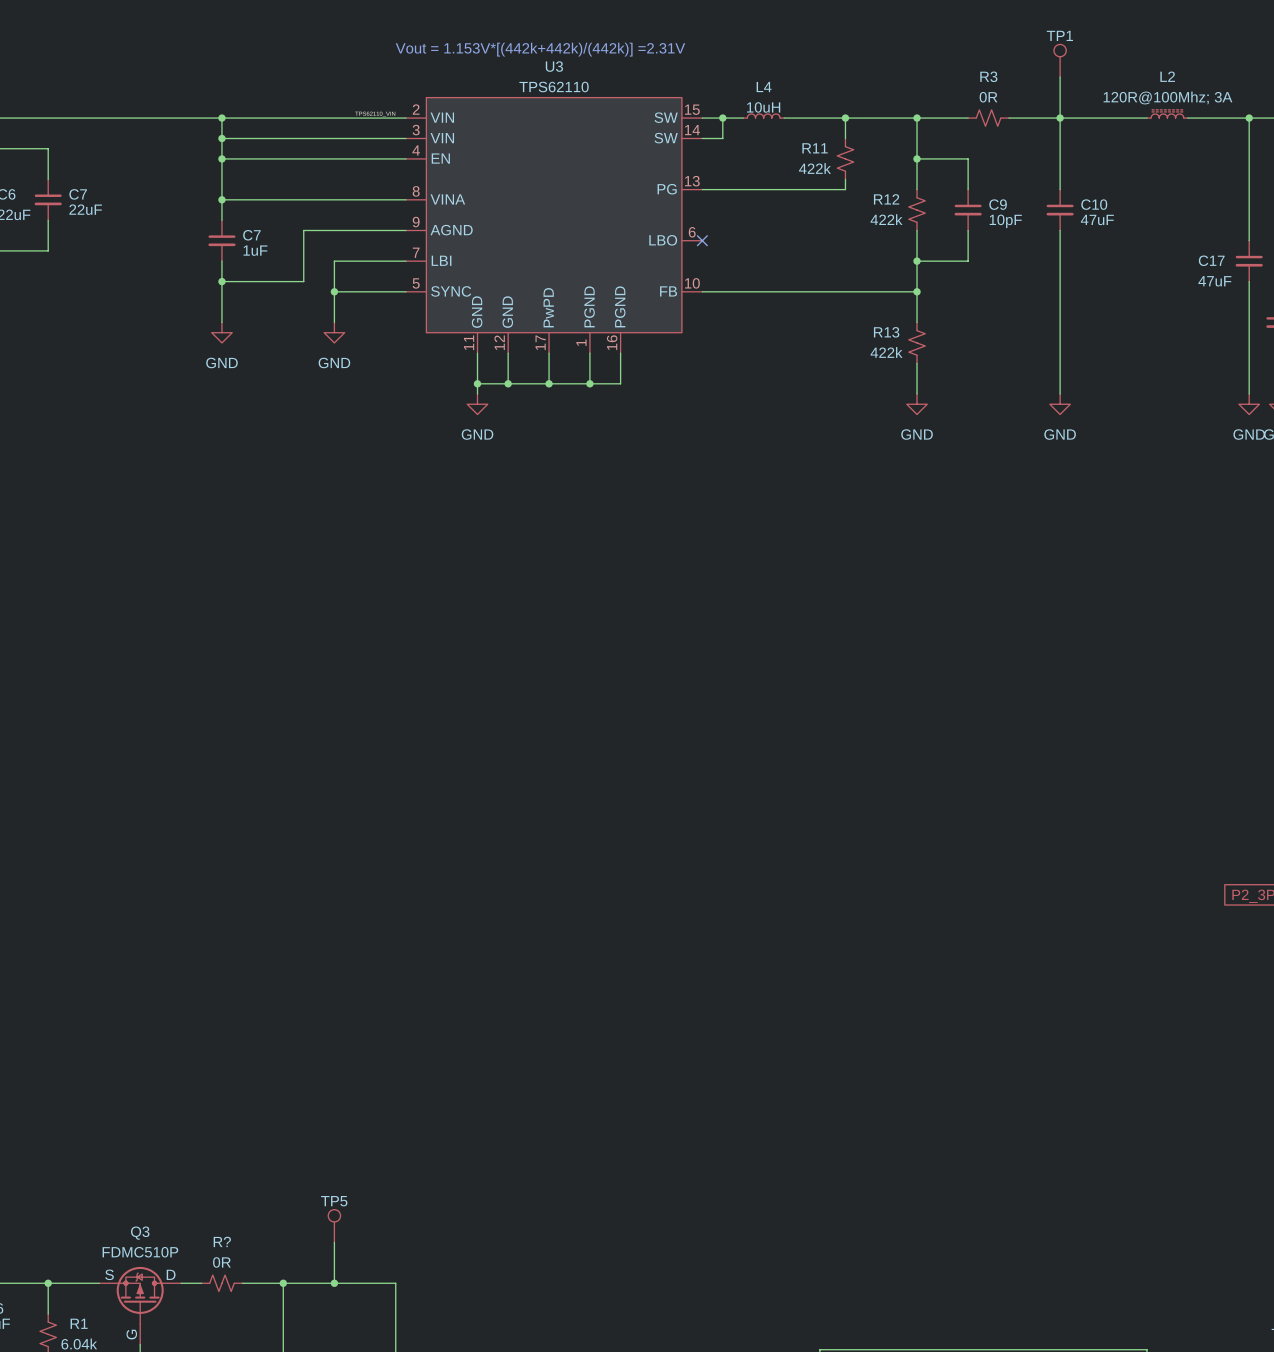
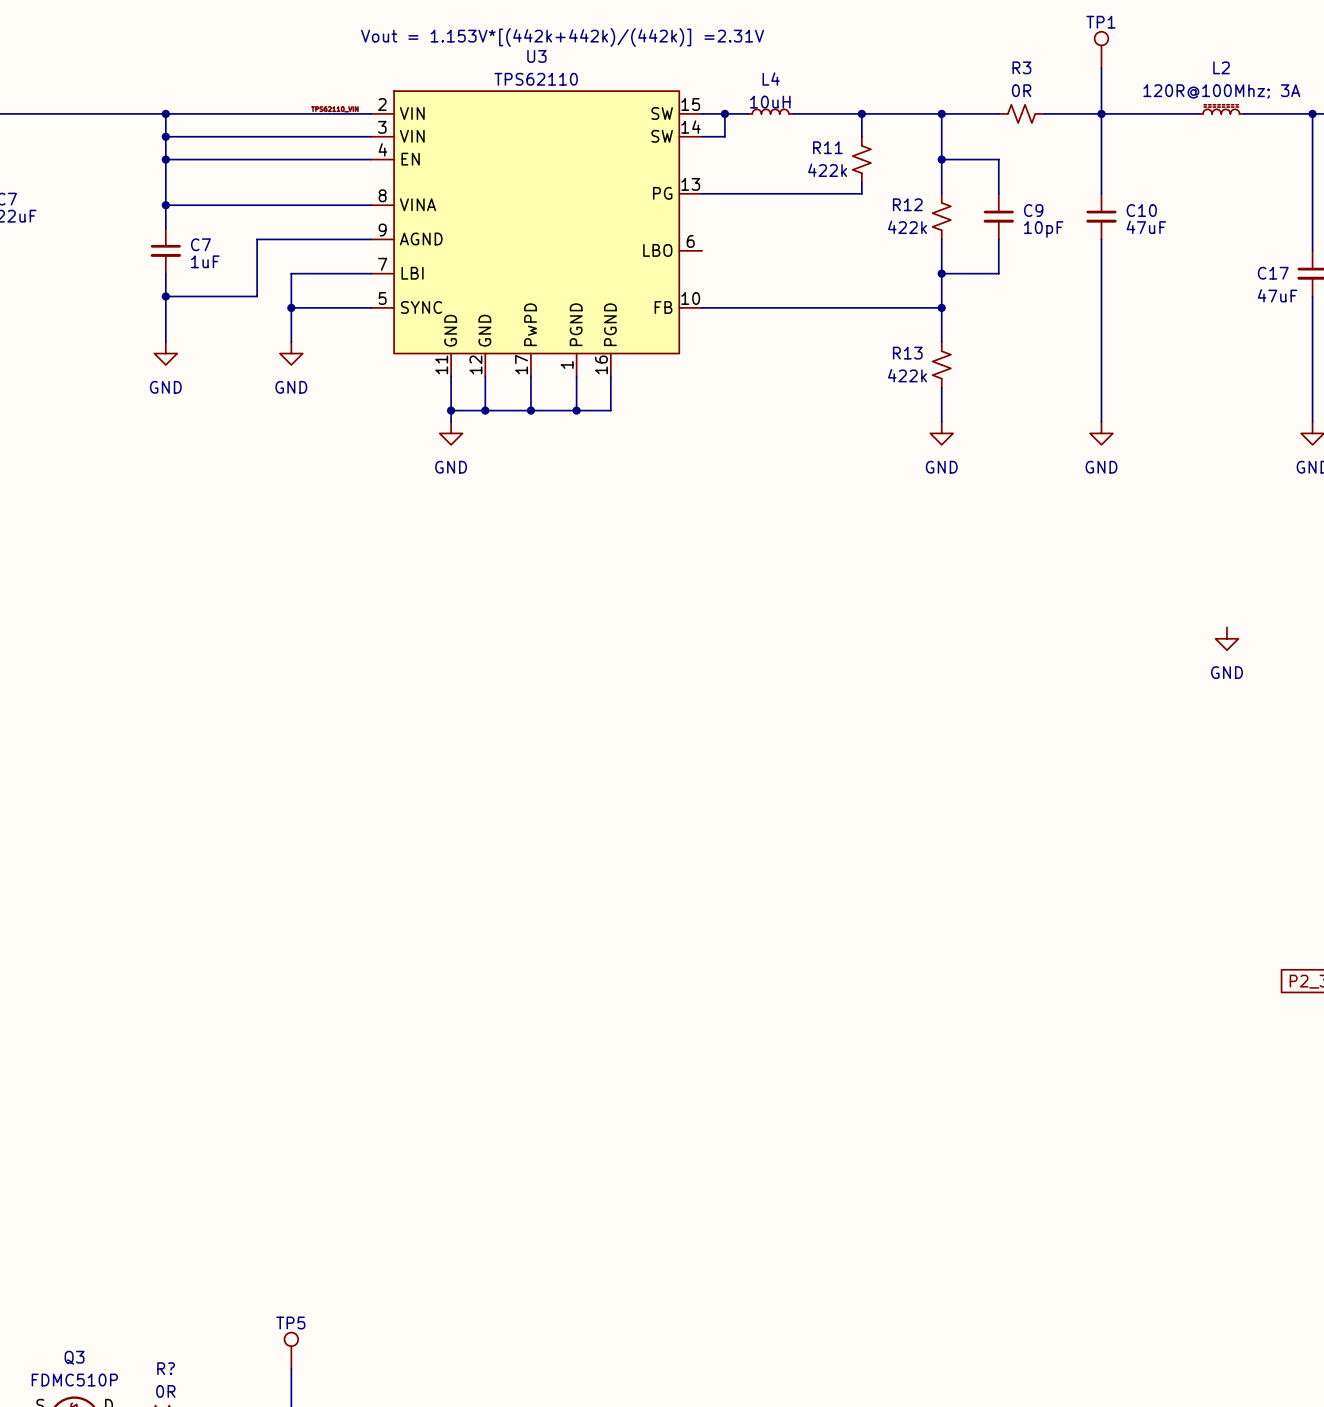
no-connect mark: (702, 240) -> none
power symbol: none -> GND (1226, 638)

